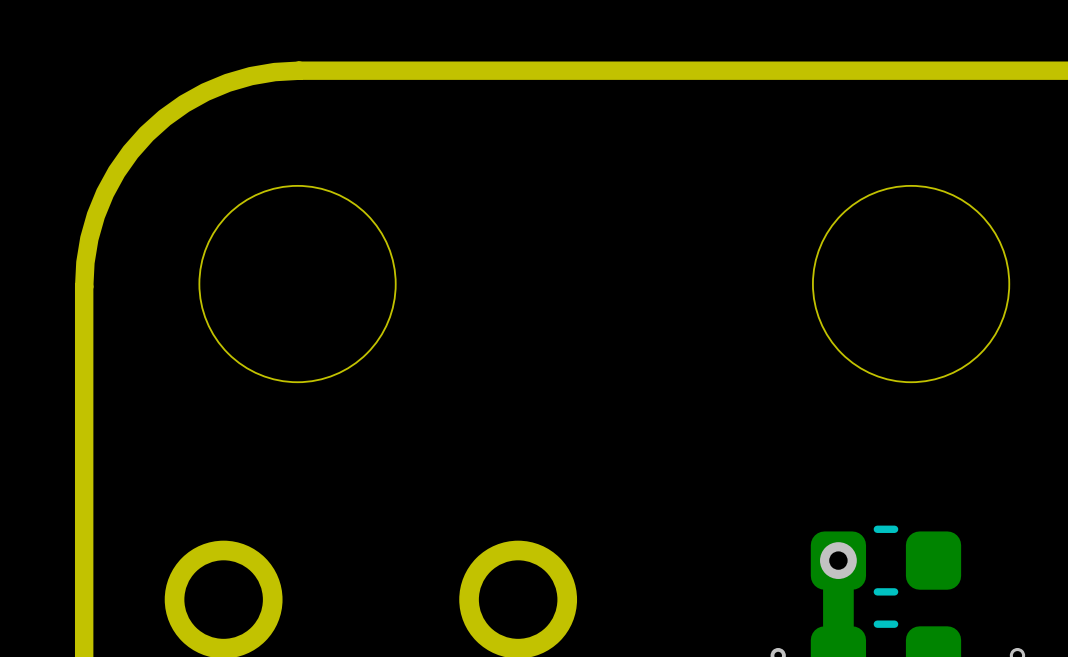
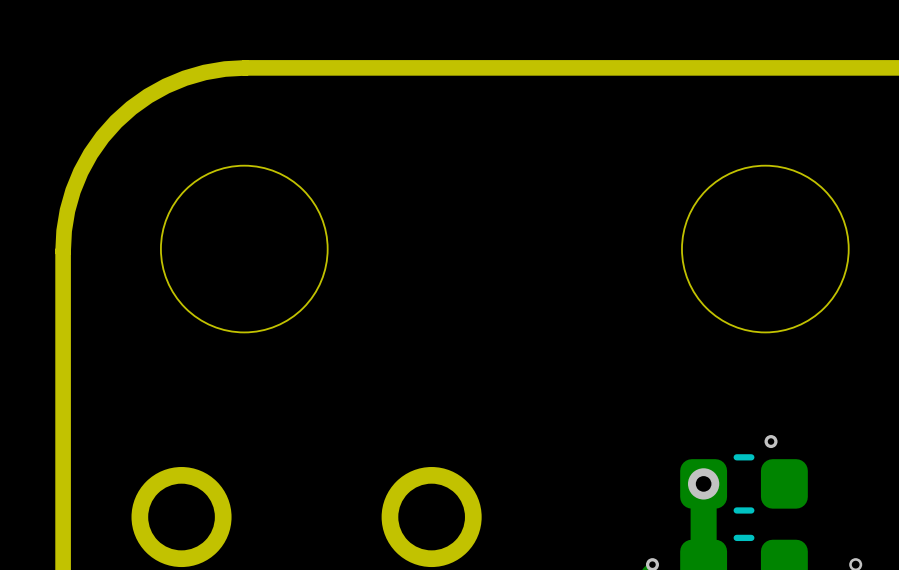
via: none -> (771, 441)

